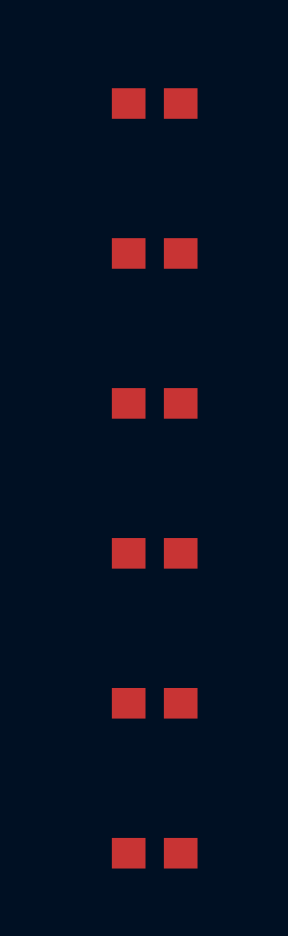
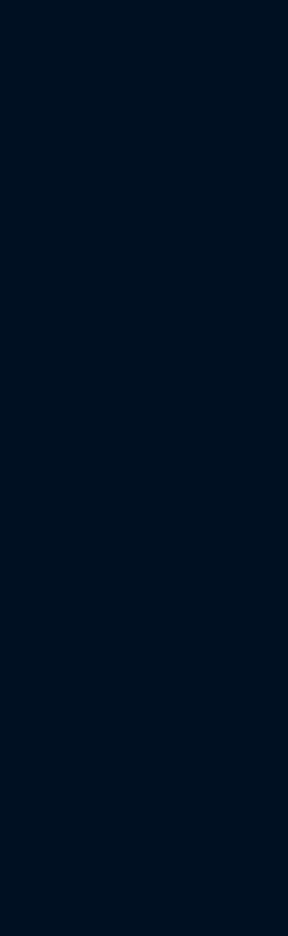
part: (154, 103) -> none
part: (154, 253) -> none
part: (154, 403) -> none
part: (154, 553) -> none
part: (154, 703) -> none
part: (154, 853) -> none

